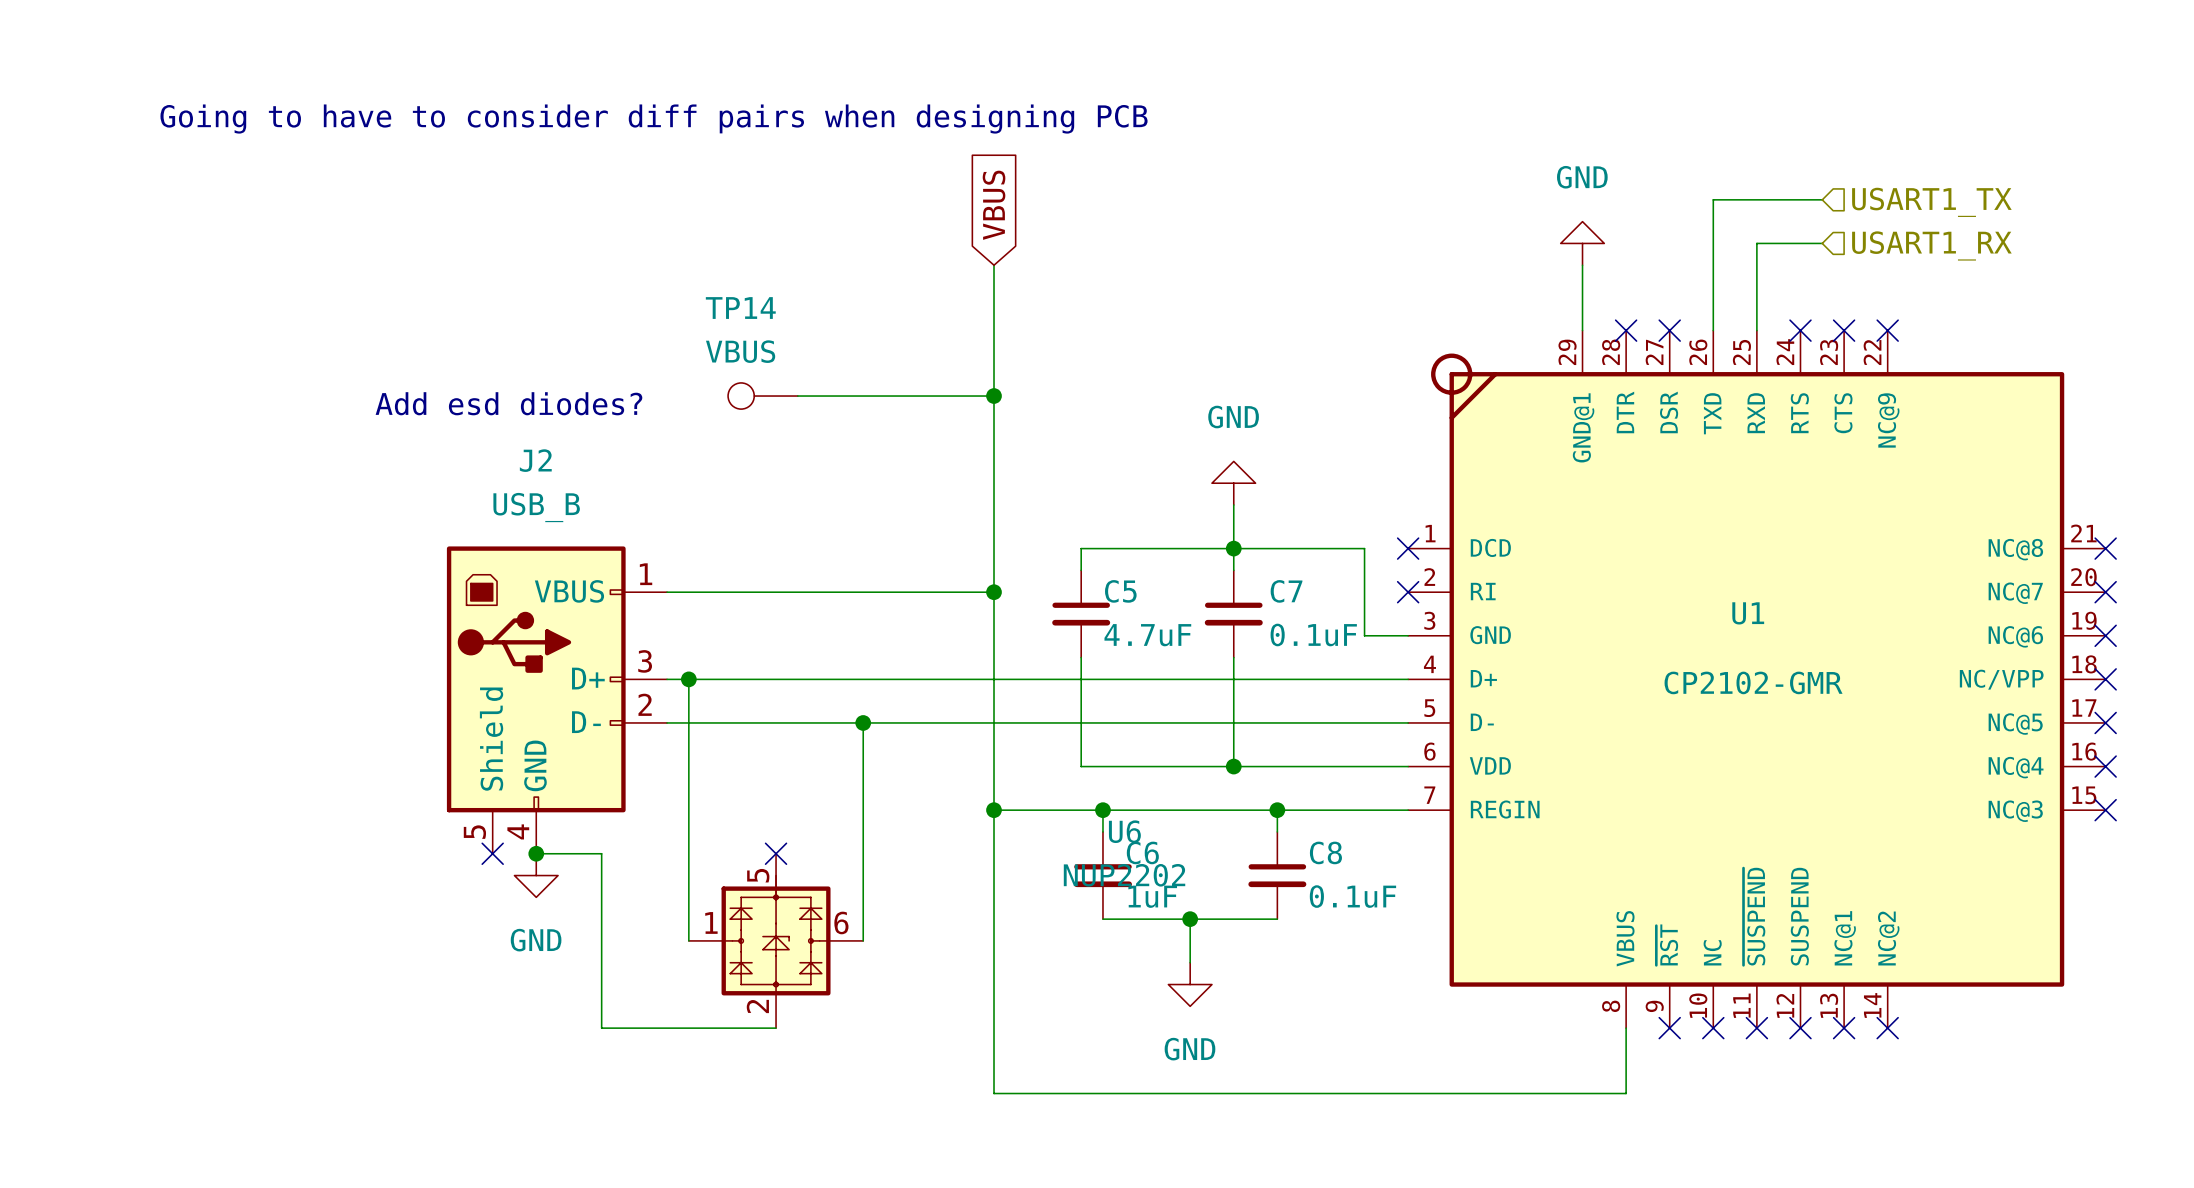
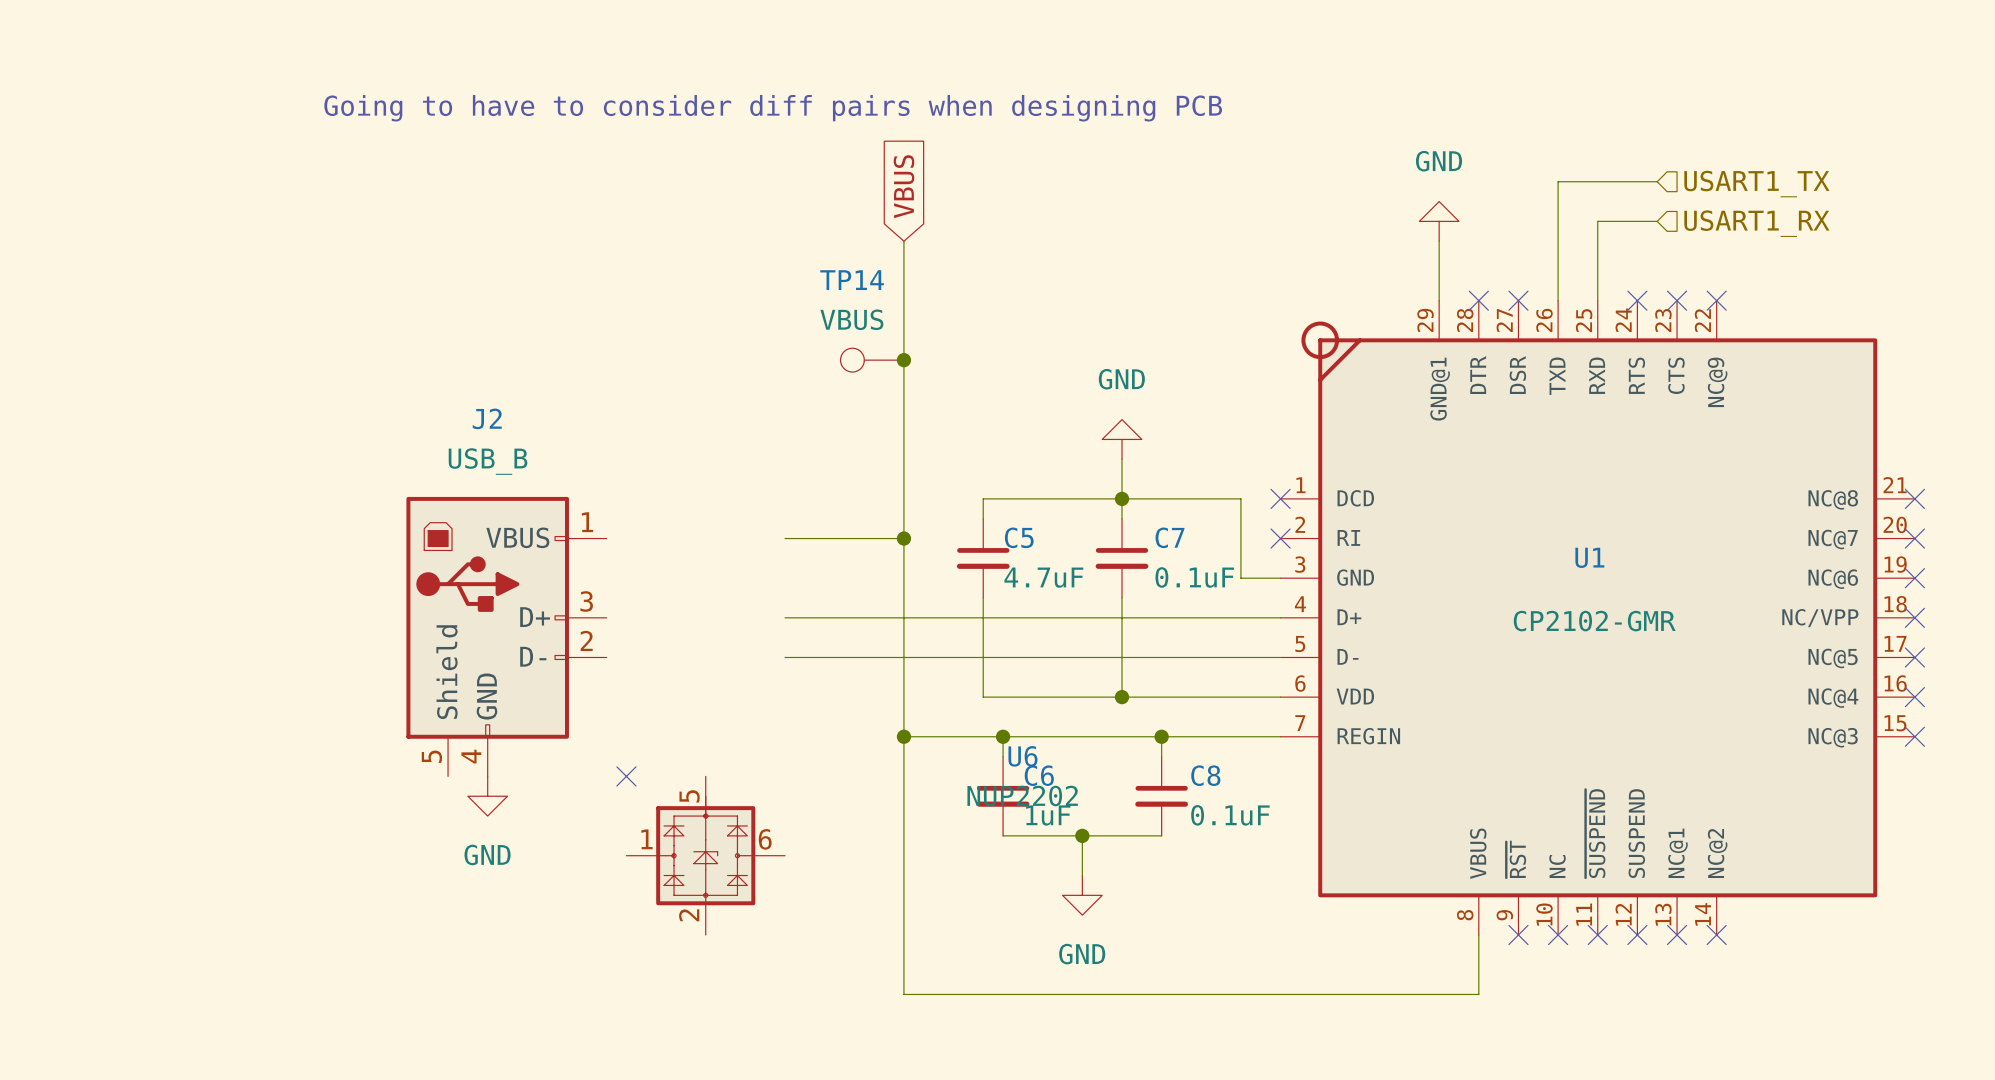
text position: Going to have to consider diff pairs when designing PCB (654, 119) -> Going to have to consider diff pairs when designing PCB (773, 108)
TP14 position: (762, 396) -> (872, 360)
wire: (797, 396) (994, 396) -> none
text: Add esd diodes? (508, 403) -> none
wire: (667, 592) (863, 592) -> none
wire: (667, 679) (863, 679) -> none
wire: (688, 679) (688, 940) -> none
junction: (688, 679) -> none
wire: (667, 722) (863, 722) (863, 940) -> none
junction: (863, 722) -> none
no-connect mark: (492, 853) -> none
wire: (536, 853) (601, 853) (601, 1028) (776, 1028) -> none
junction: (536, 853) -> none
no-connect mark position: (776, 853) -> (626, 776)

